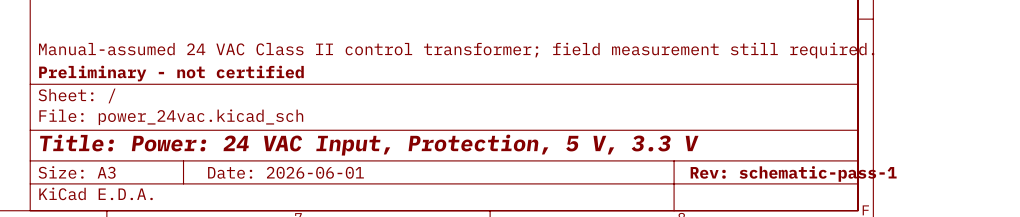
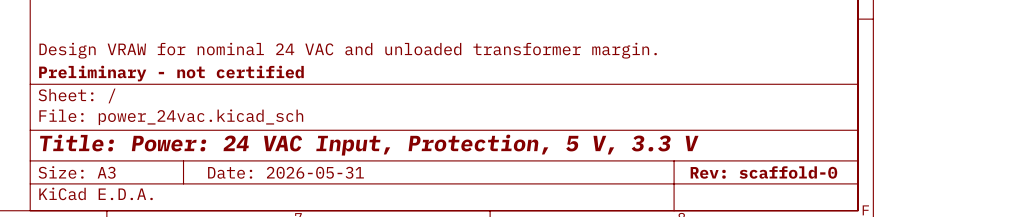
title block: Manual-assumed 24 VAC Class II control transformer; field measurement still required. (456, 50) -> Design VRAW for nominal 24 VAC and unloaded transformer margin. (348, 50)
title block: Date: 2026-06-01 (285, 172) -> Date: 2026-05-31 (285, 172)
title block: Rev: schematic-pass-1 (793, 173) -> Rev: scaffold-0 (763, 172)

